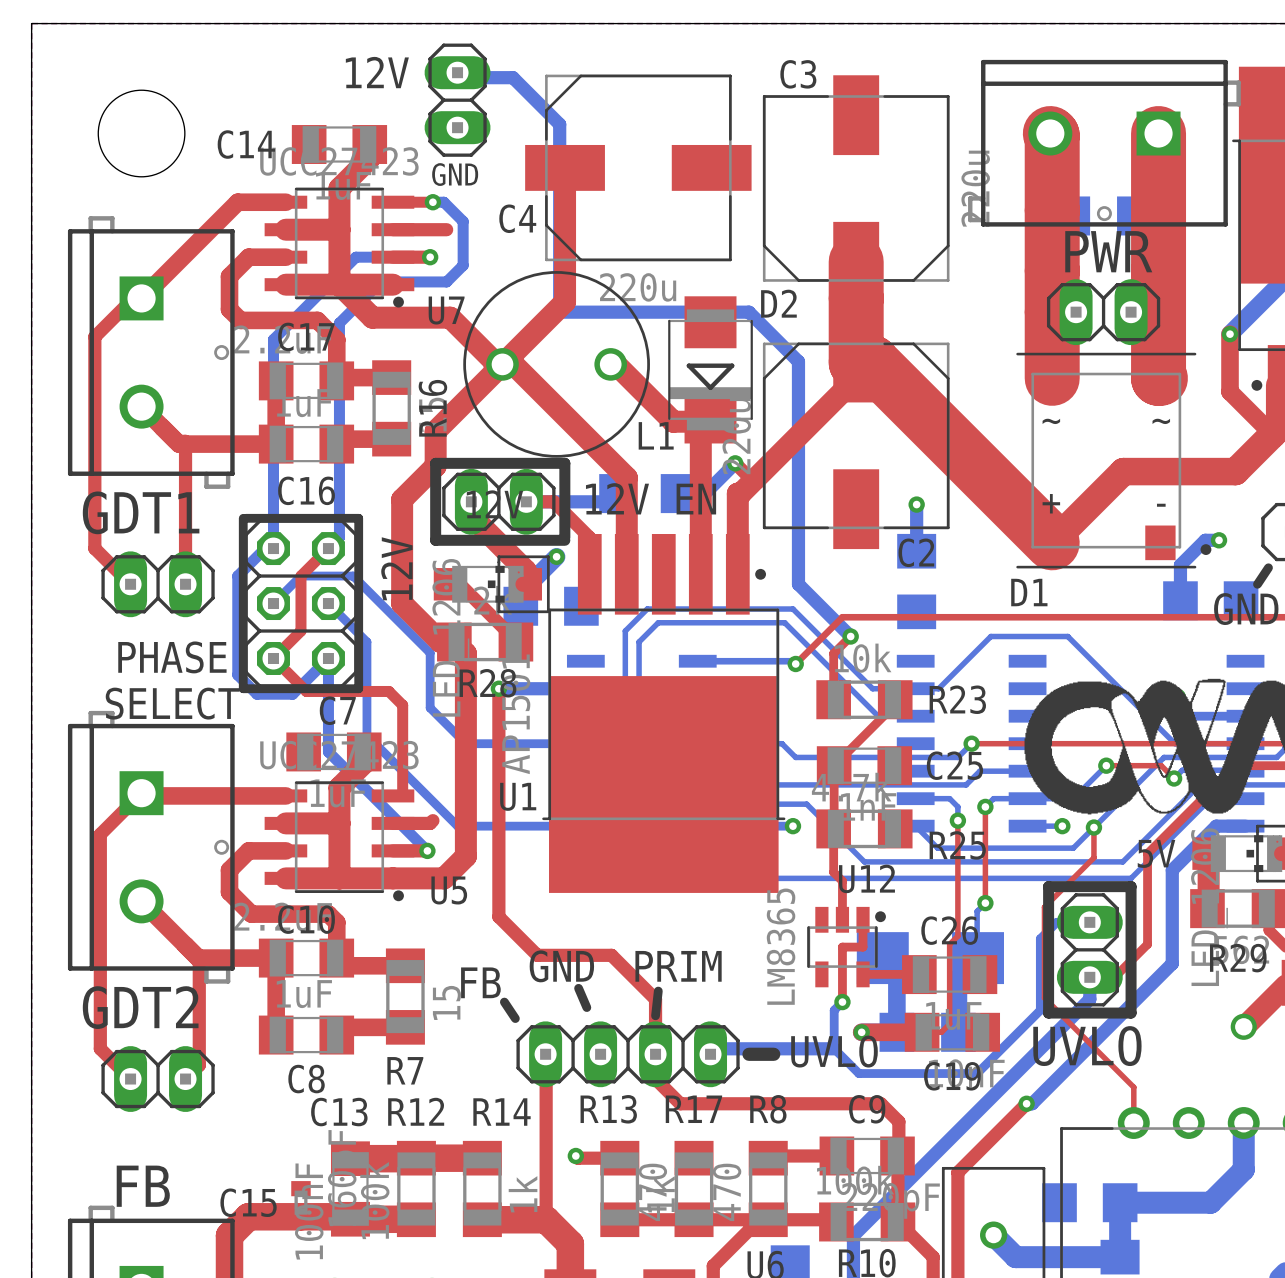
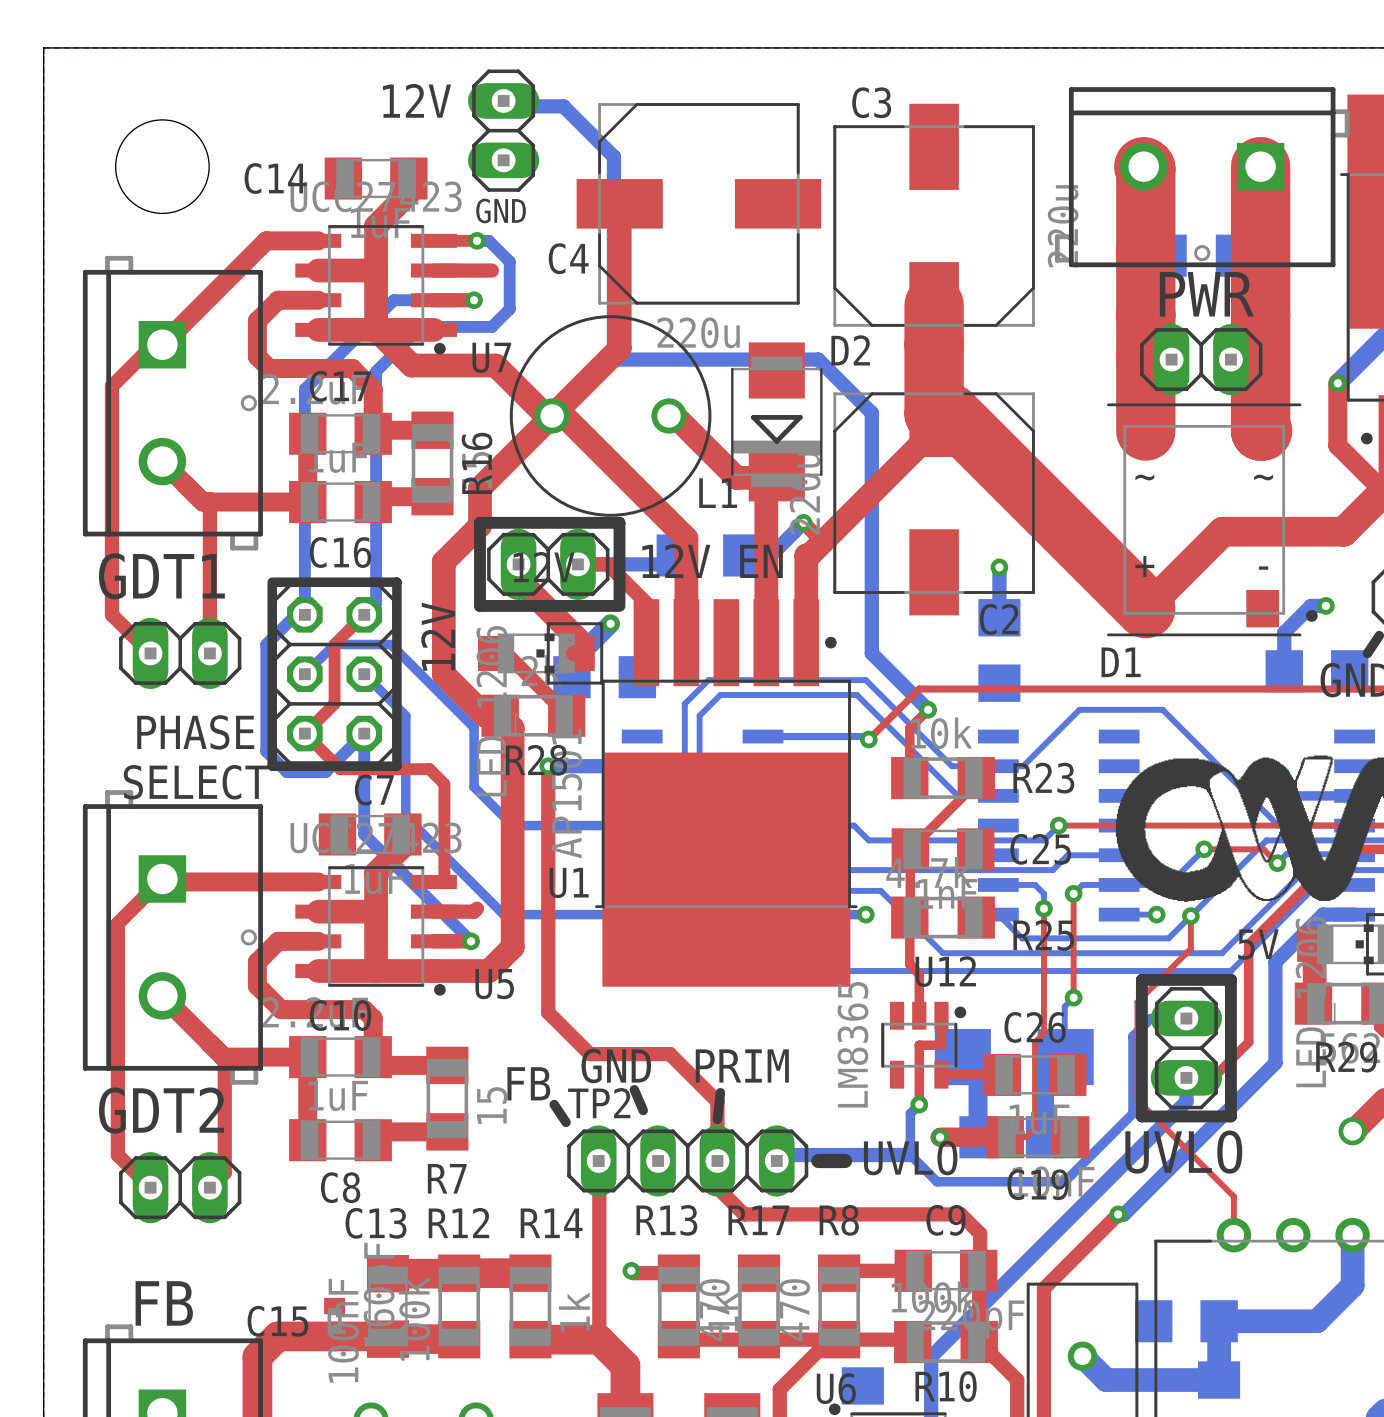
TP2 name: none -> TP2 (599, 1103)

